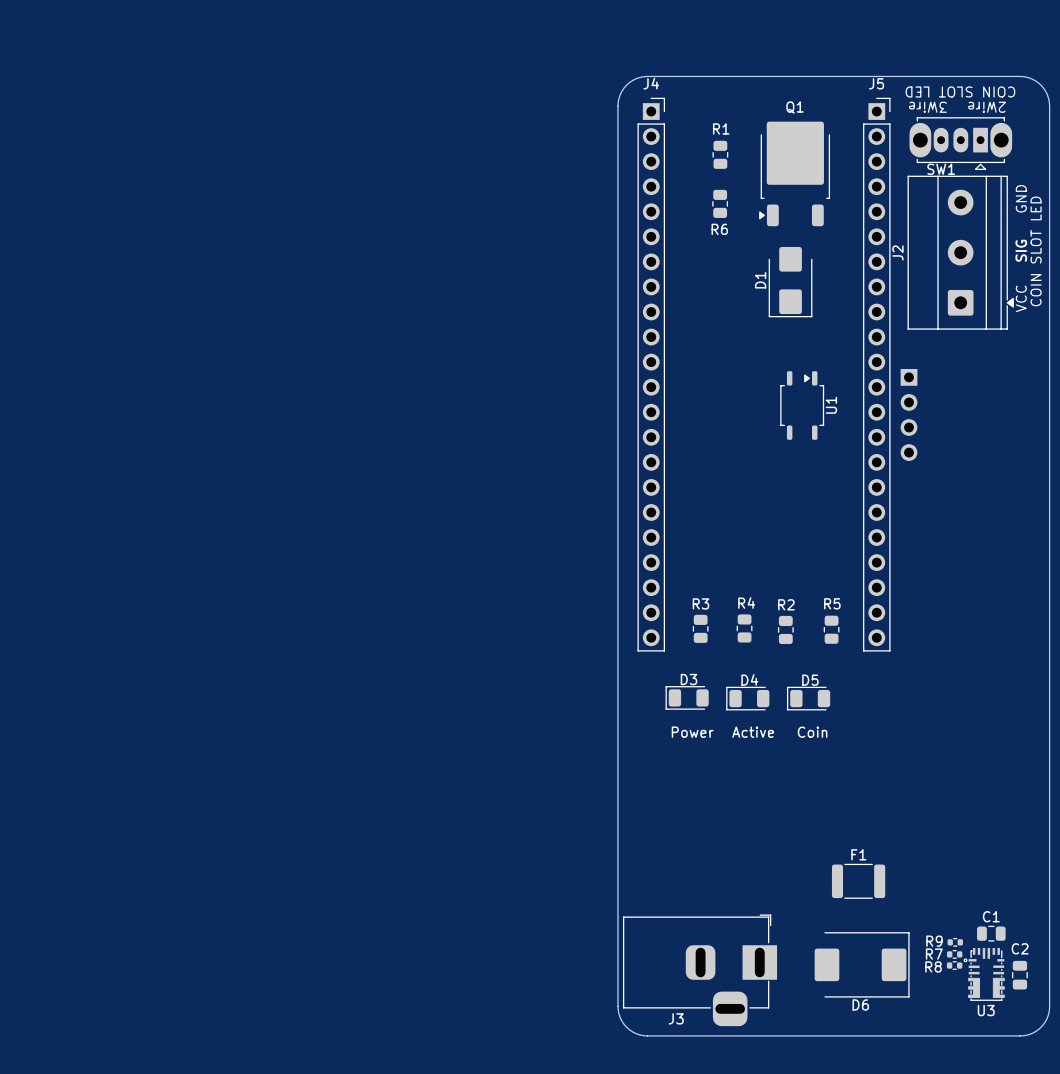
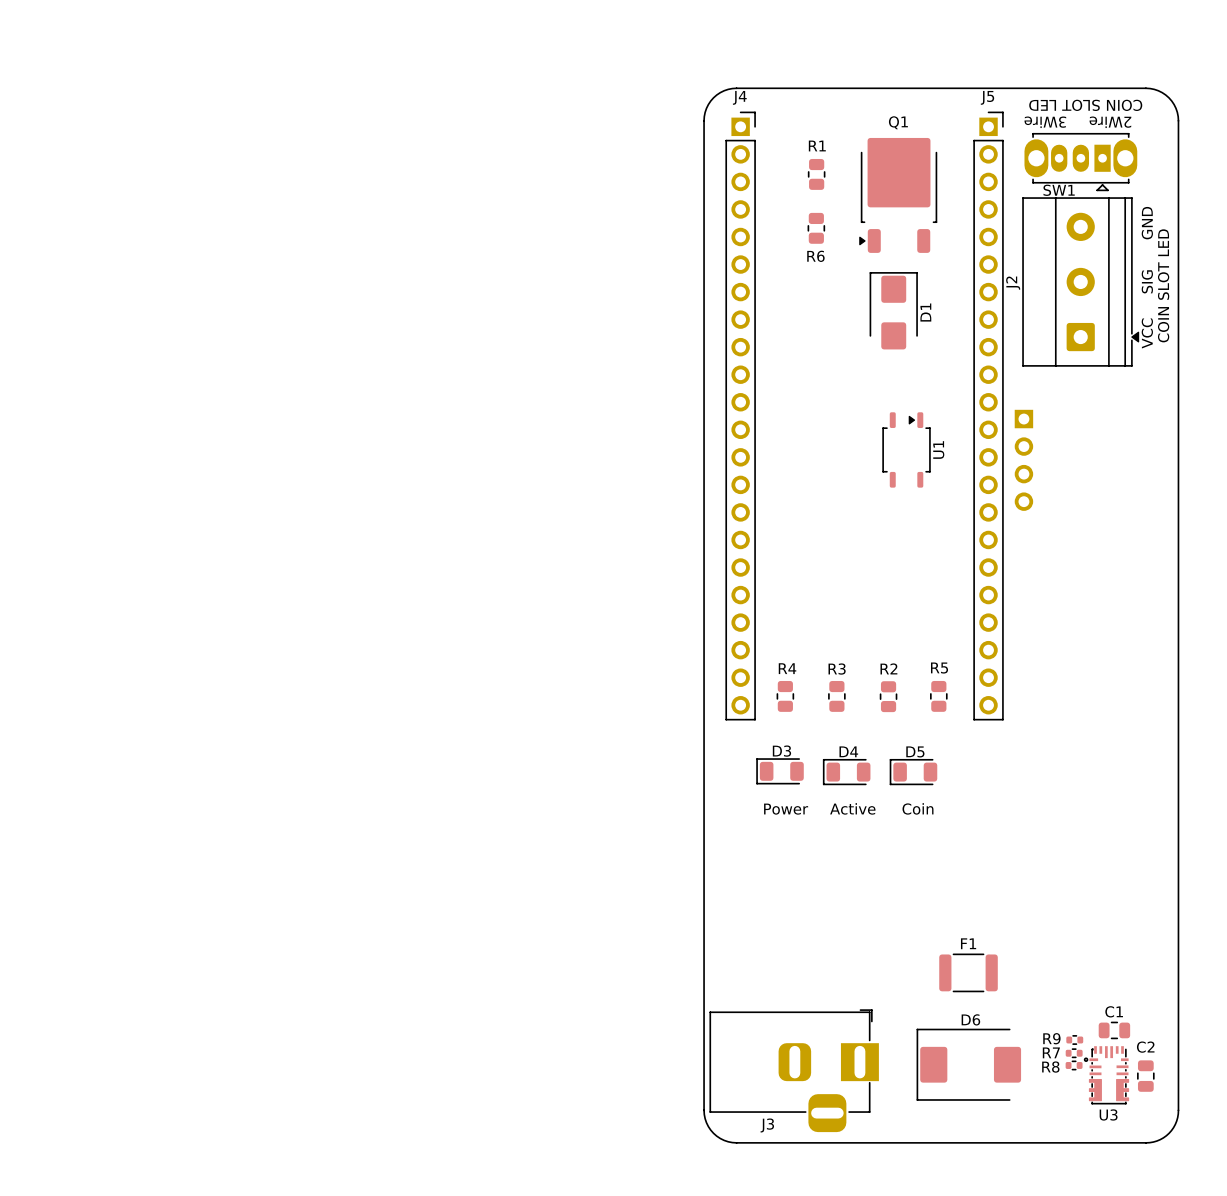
D1 rotation: 0° (790, 282) -> 180° (893, 310)
R3 position: (700, 628) -> (836, 696)
R4 position: (744, 628) -> (785, 696)
D6 rotation: 0° (862, 964) -> 180° (968, 1064)

